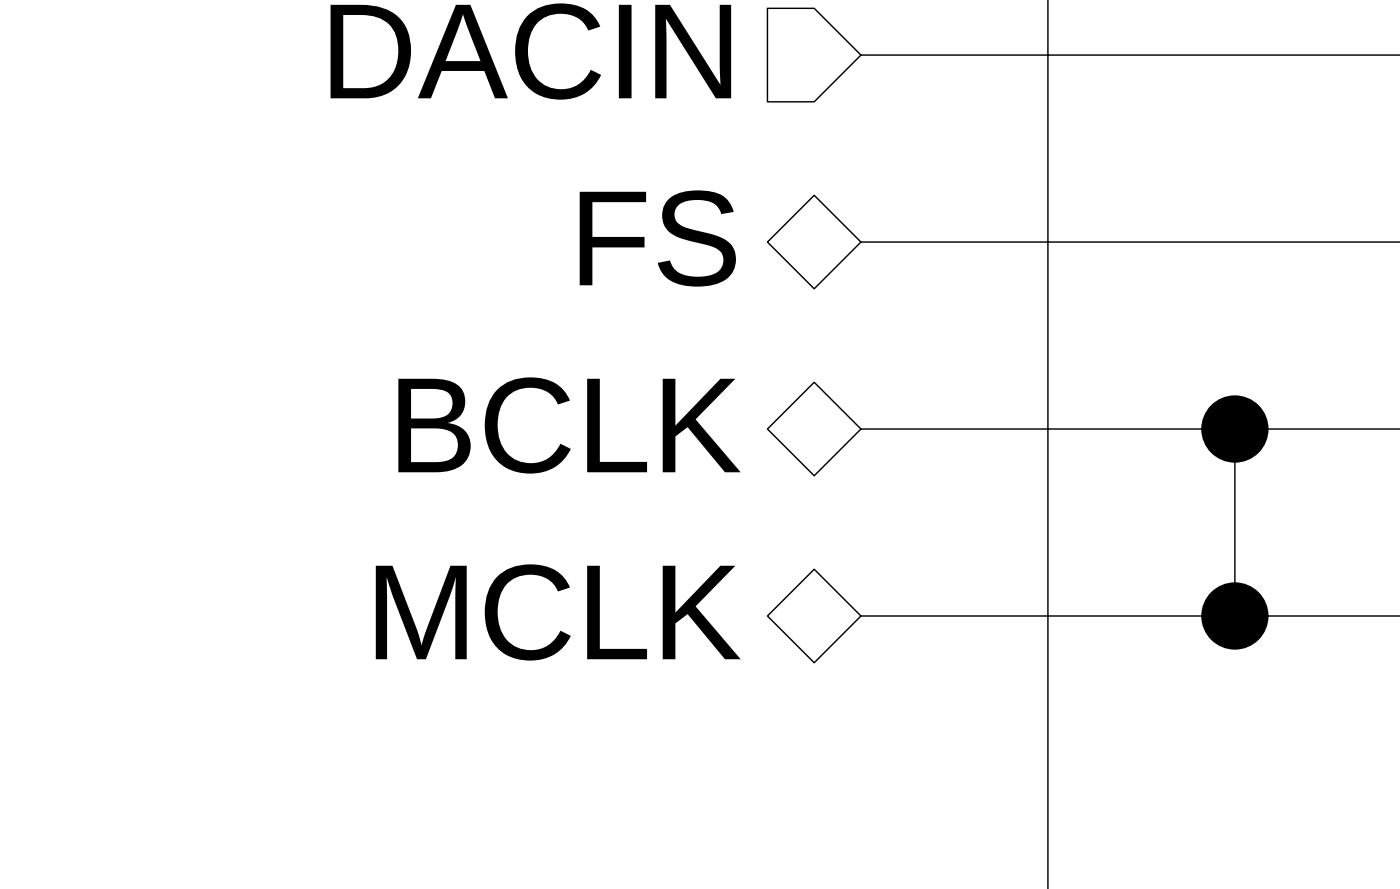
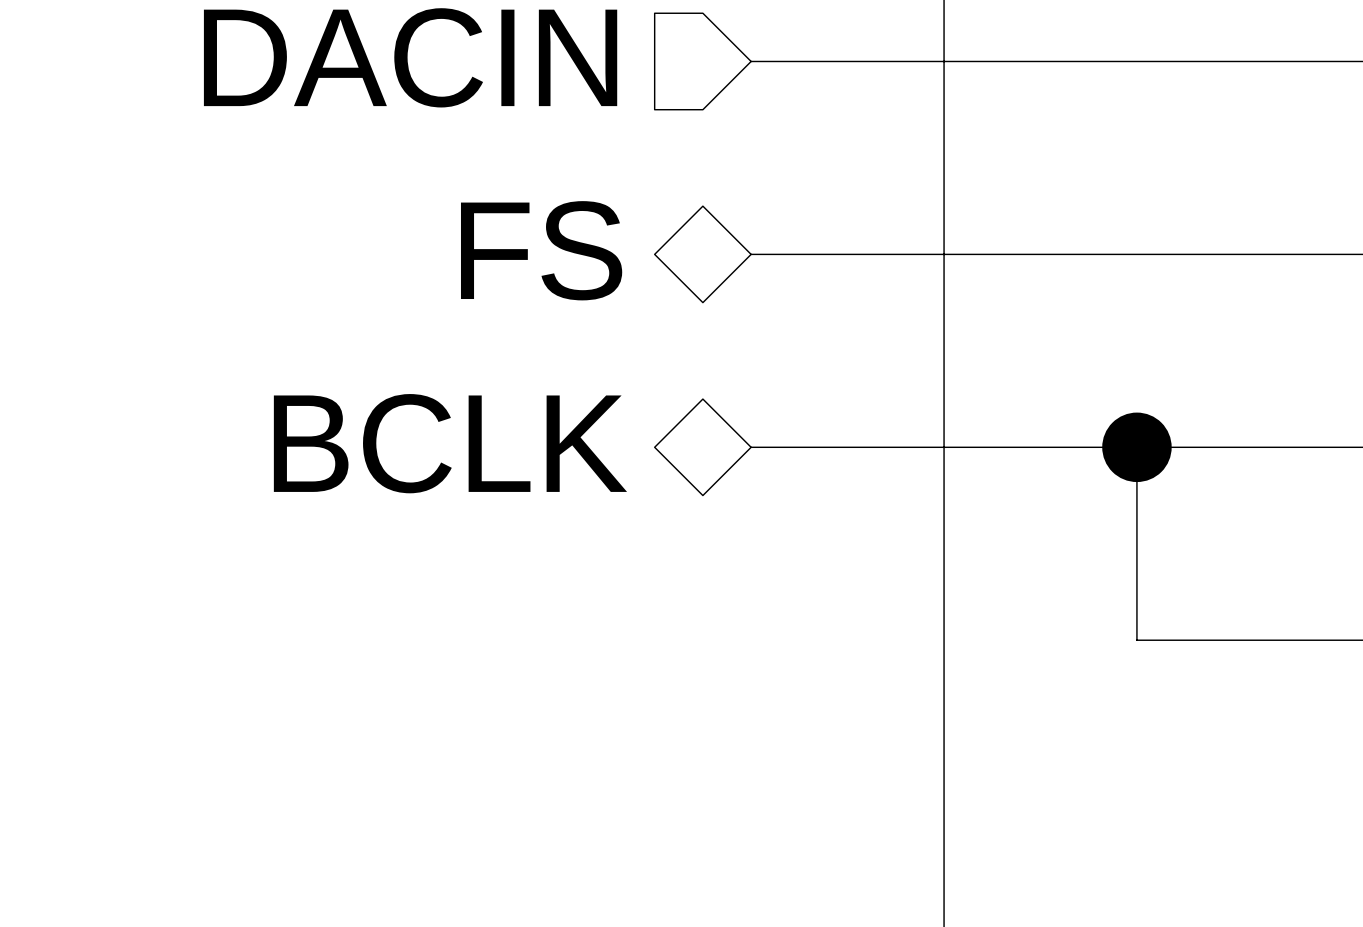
hierarchical label: MCLK (558, 612) -> none
wire: (860, 615) (1234, 615) -> none
junction: (1234, 615) -> none

